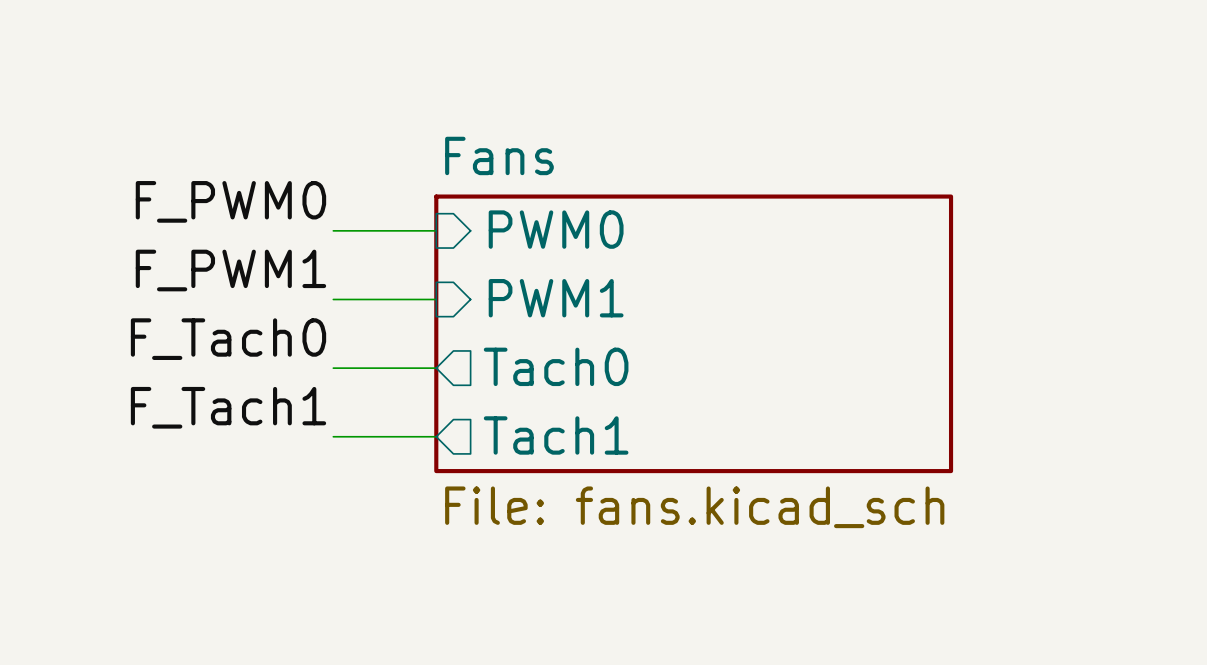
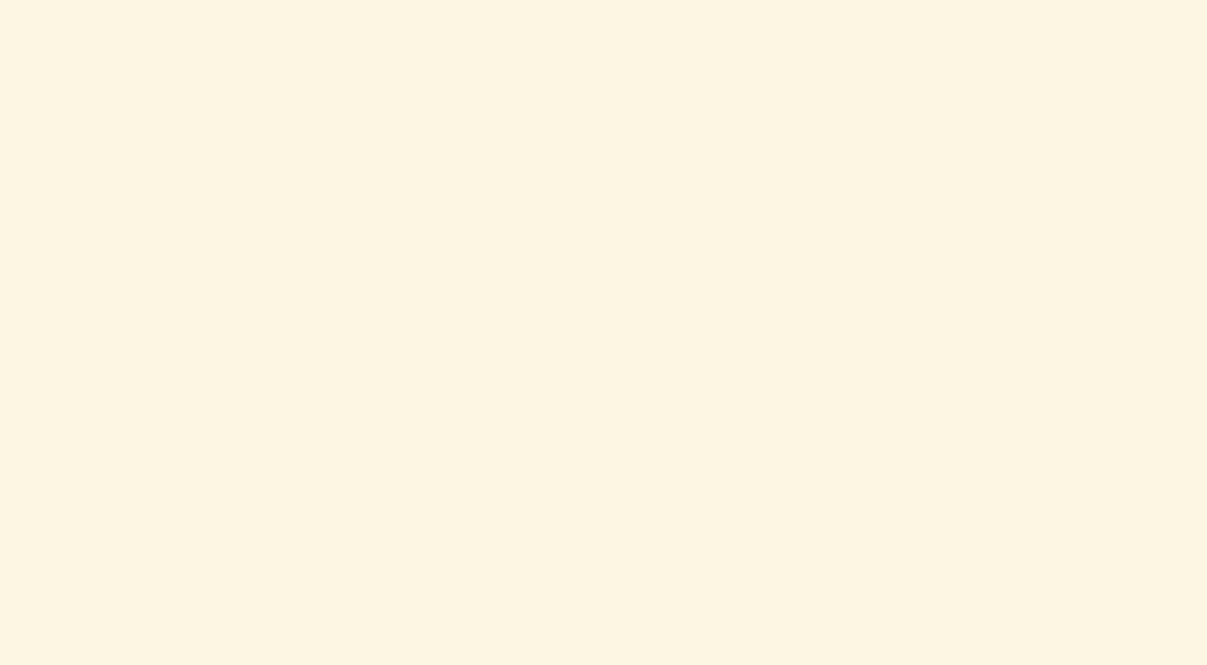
label: F_PWM0 (230, 201) -> none
sheet pin: PWM0 (556, 229) -> none
wire: (333, 230) (436, 230) -> none
label: F_PWM1 (230, 270) -> none
sheet pin: PWM1 (556, 298) -> none
wire: (333, 299) (436, 299) -> none
sheet Fans: File: fans.kicad_sch (693, 333) -> none
label: F_Tach0 (228, 339) -> none
sheet pin: Tach0 (556, 366) -> none
wire: (333, 368) (436, 368) -> none
label: F_Tach1 (228, 407) -> none
sheet pin: Tach1 (556, 435) -> none
wire: (333, 436) (436, 436) -> none

